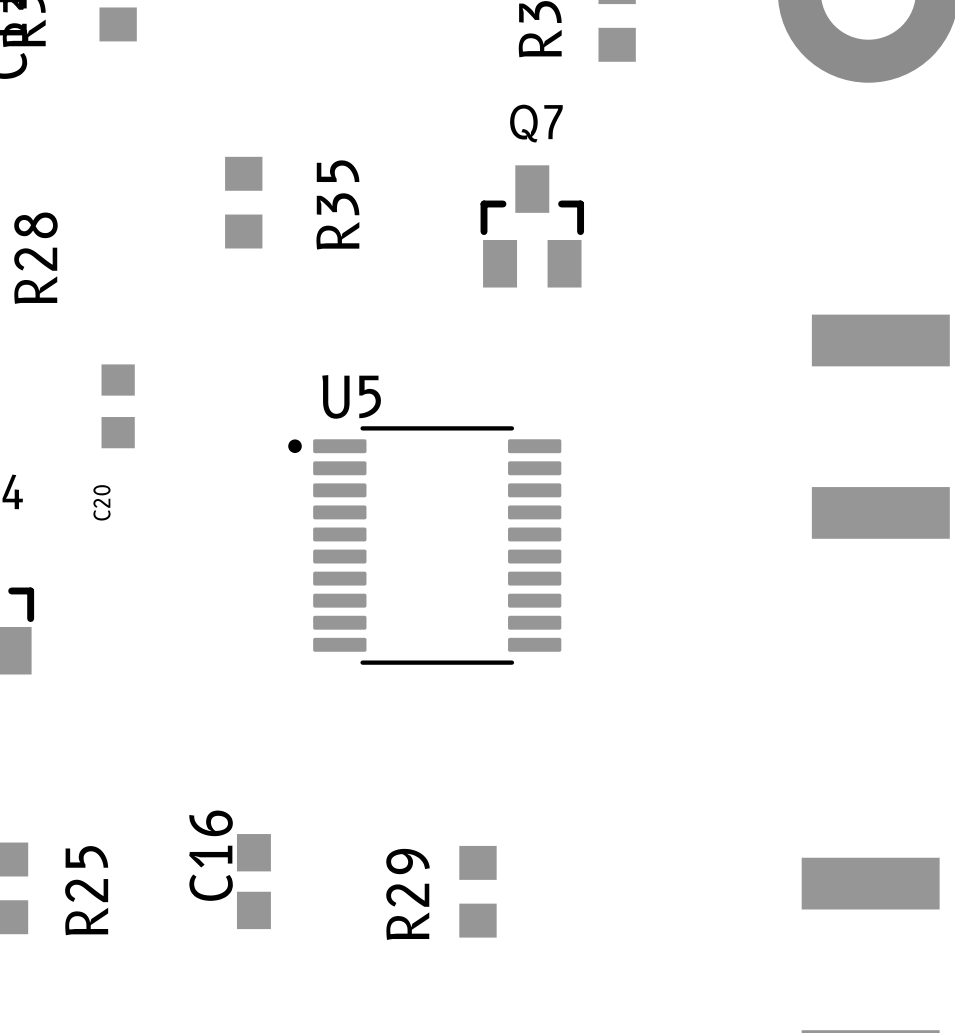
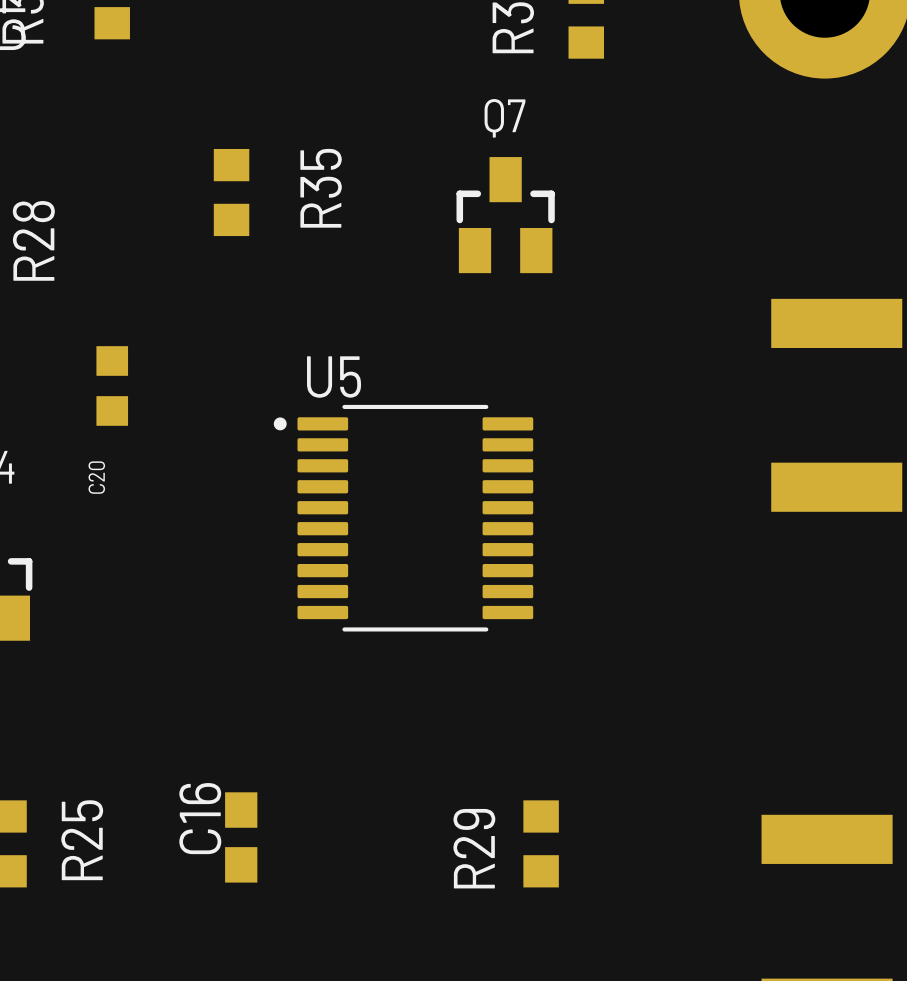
R29 position: (477, 891) -> (541, 843)

